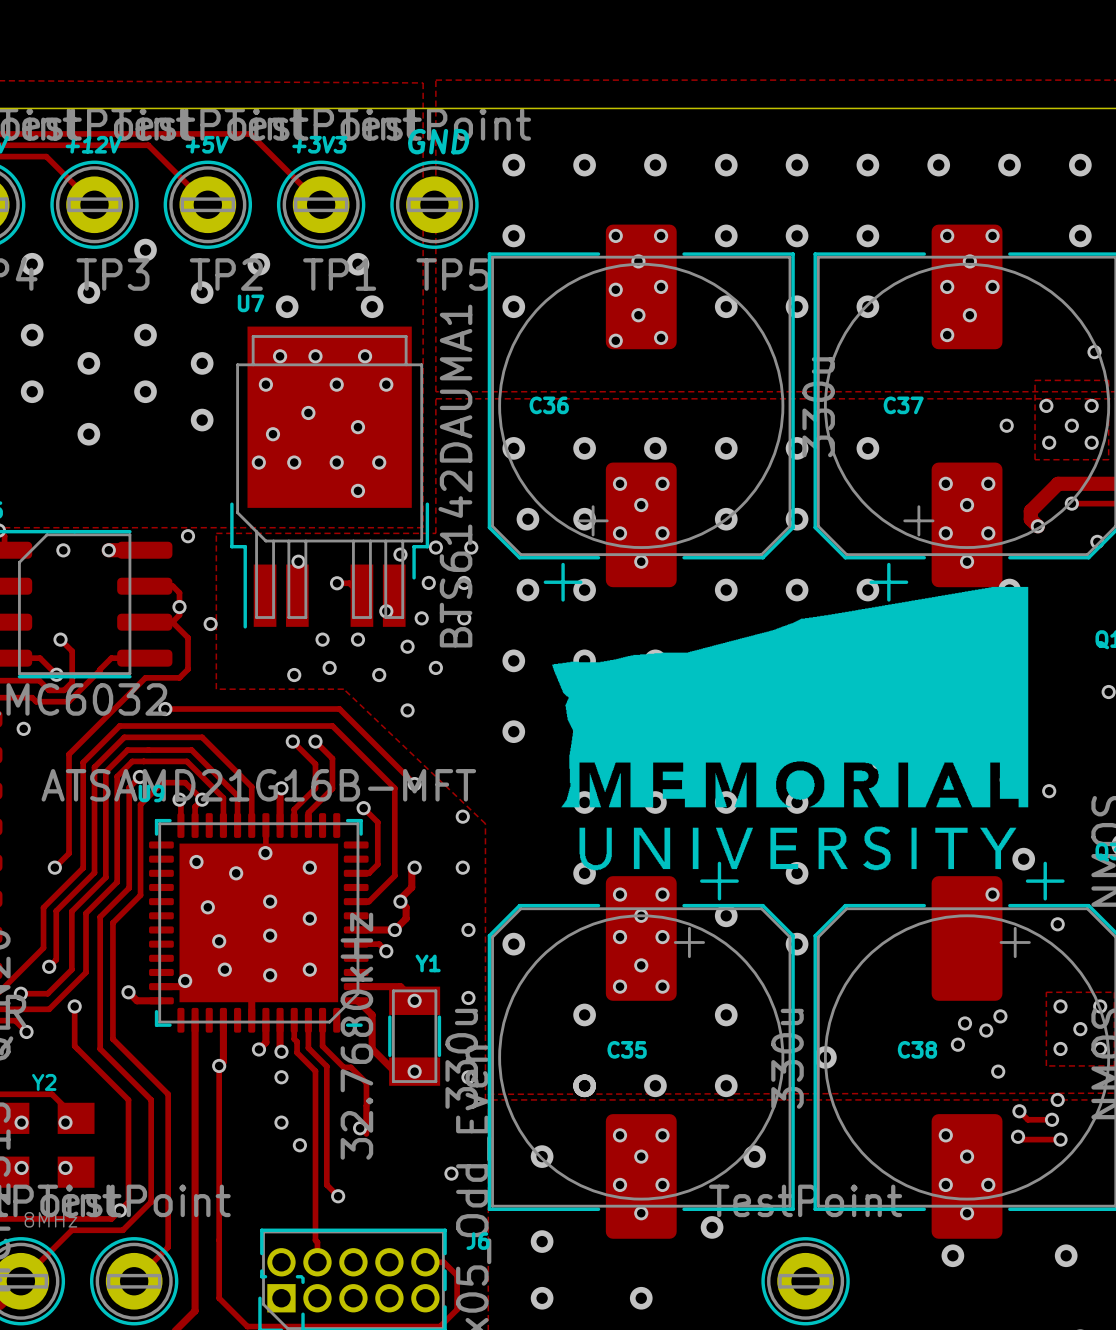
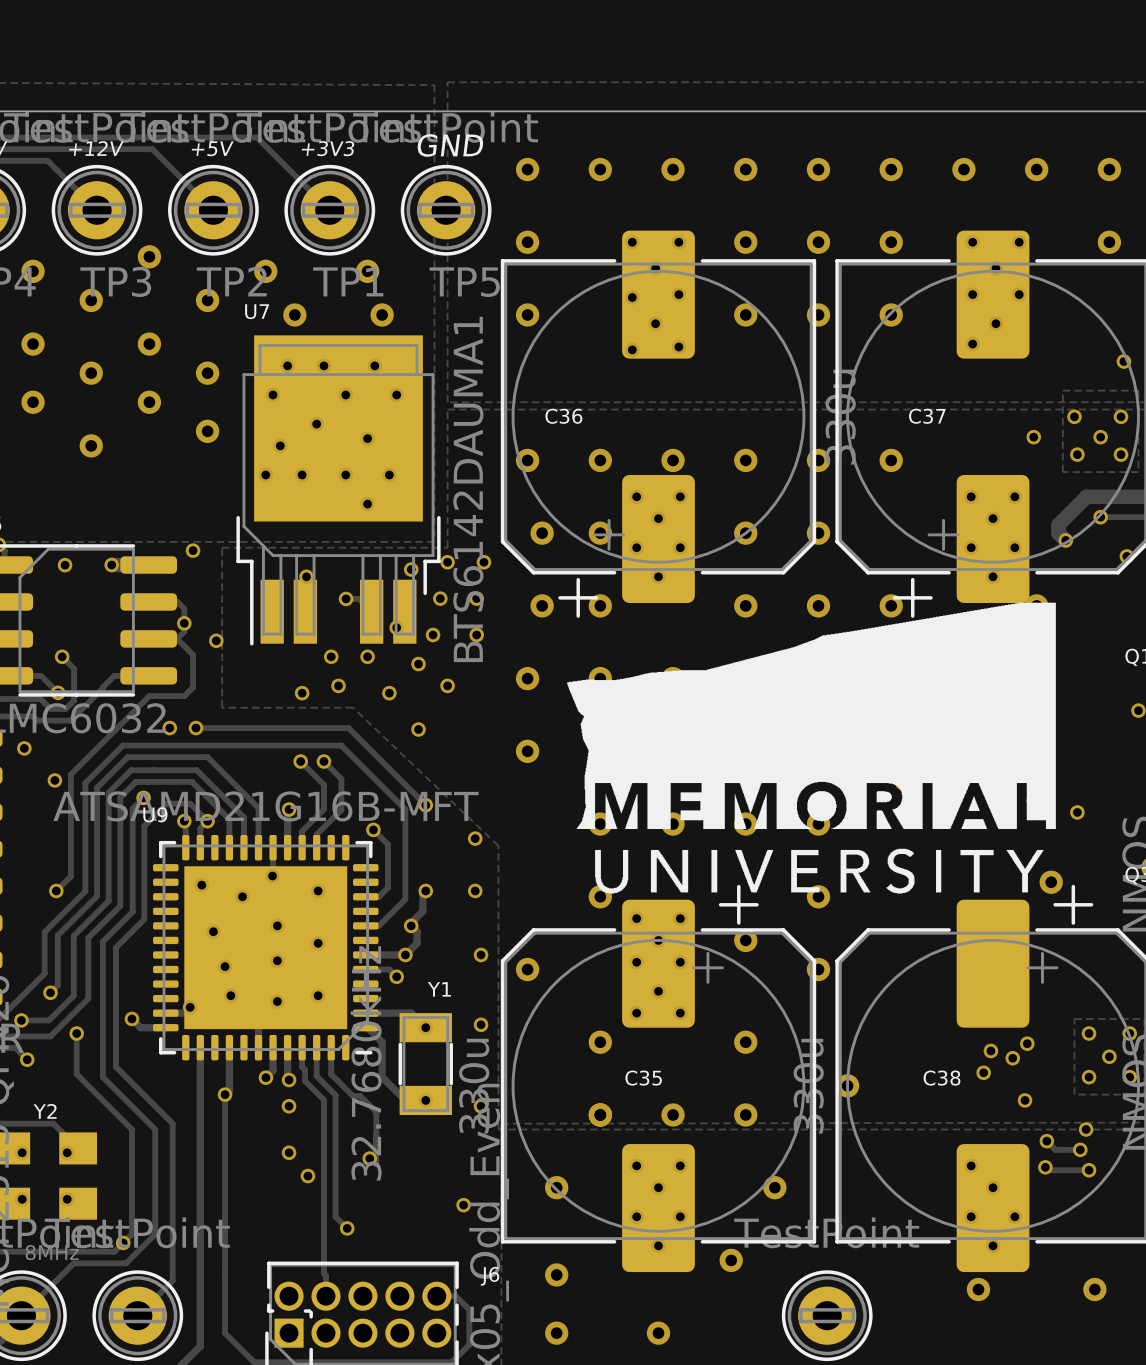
track: (165, 709) (190, 709) -> none
via: none -> (195, 728)
via: none -> (54, 780)
via: (992, 894) -> none
via: (1057, 924) -> none

